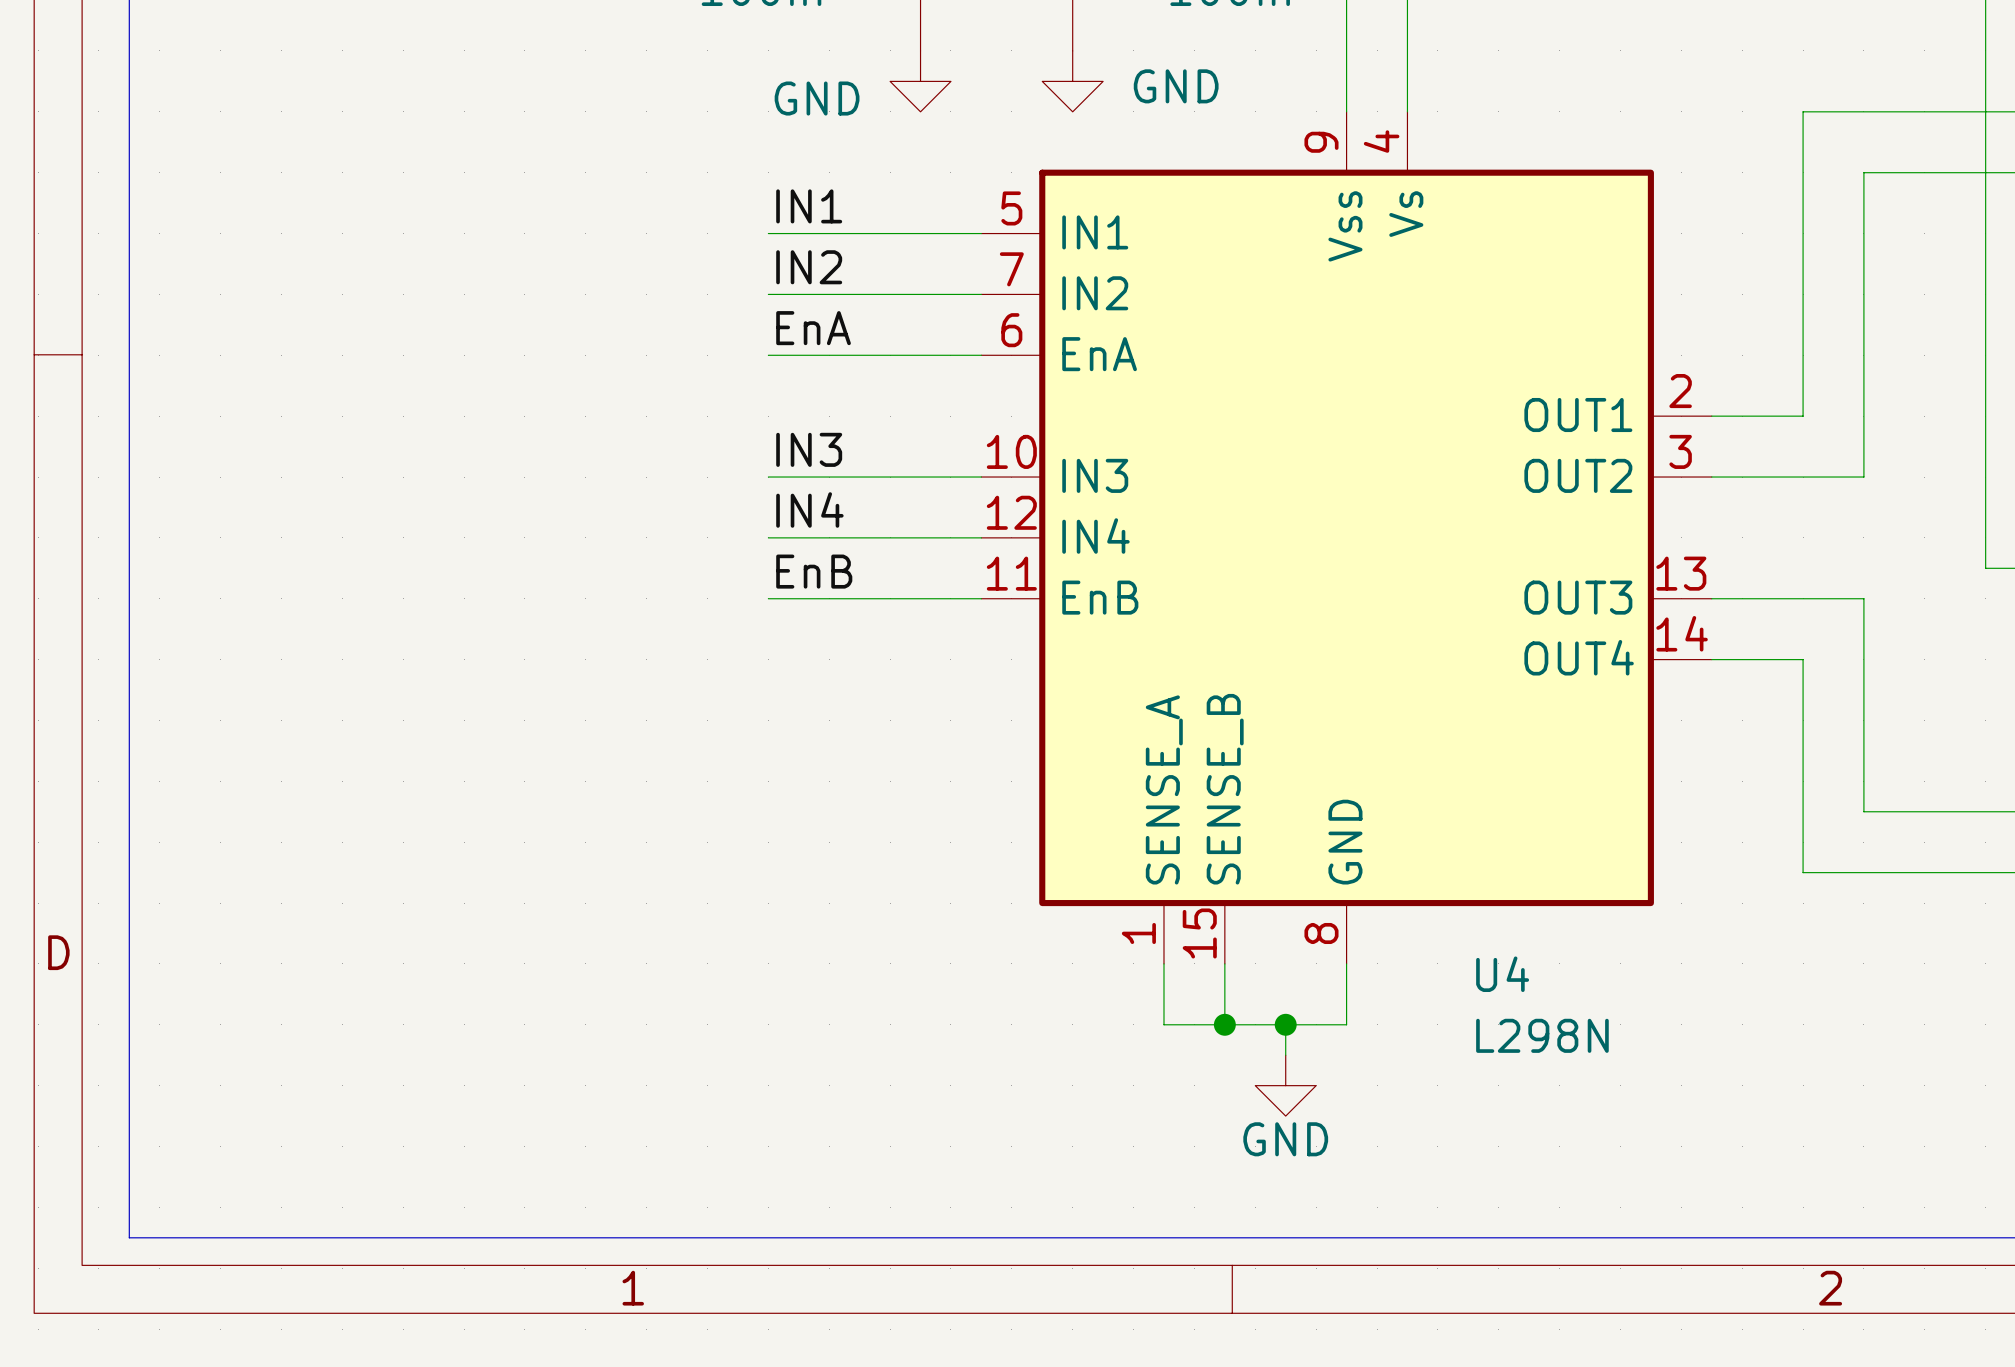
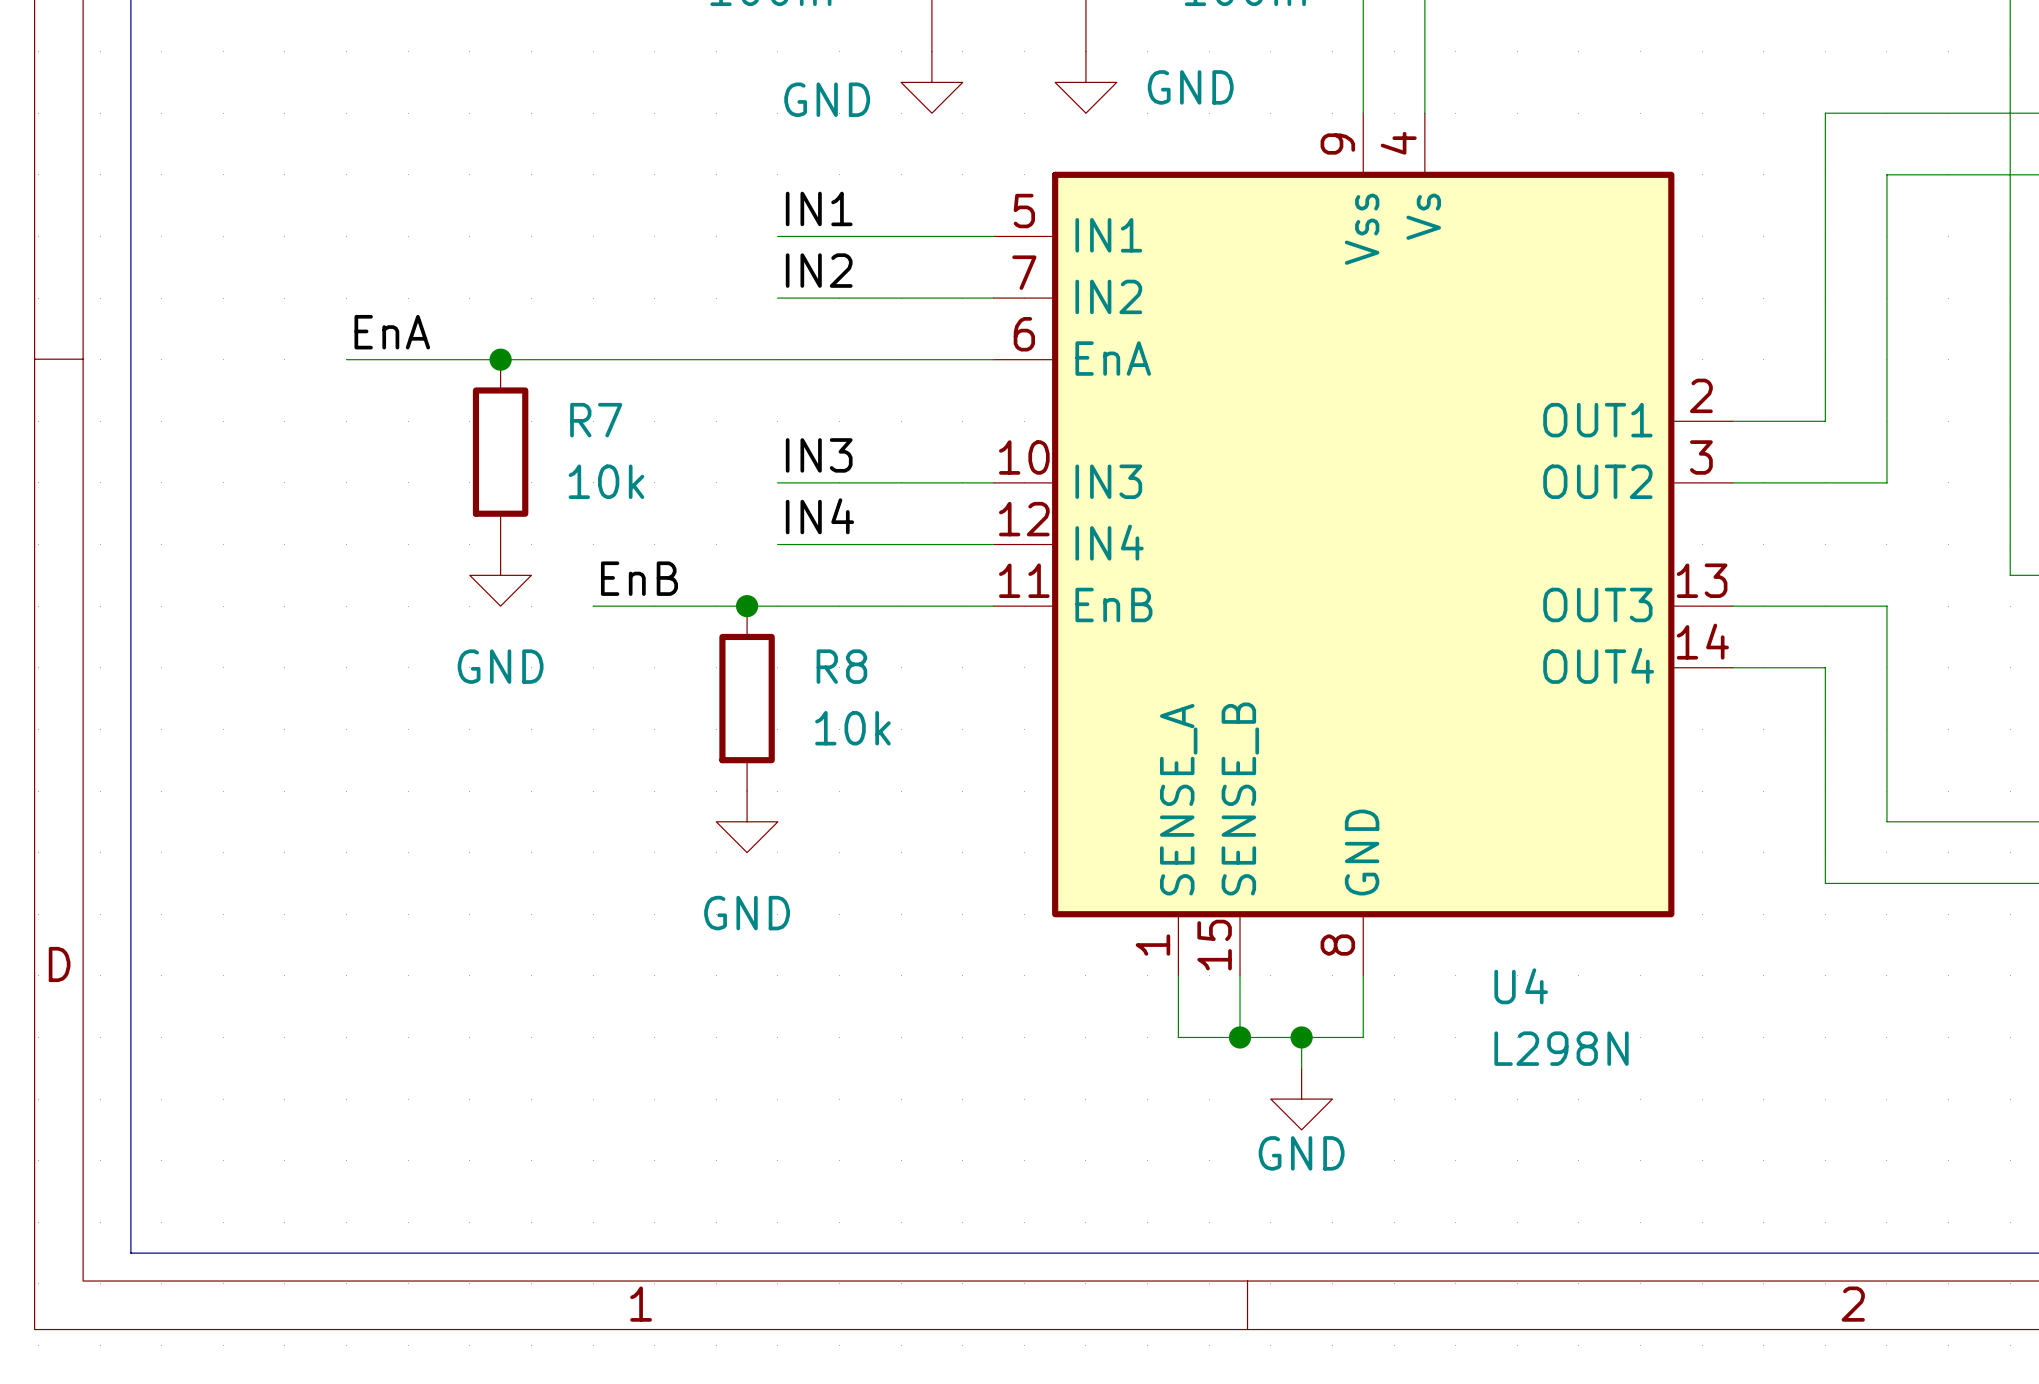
label position: EnA (813, 328) -> EnA (392, 332)
wire: none -> (346, 359) (777, 359)
junction: none -> (500, 359)
R7: none -> 10k (500, 452)
power symbol: none -> GND (500, 575)
label position: EnB (814, 571) -> EnB (639, 578)
wire: none -> (593, 606) (777, 606)
junction: none -> (747, 606)
R8: none -> 10k (747, 698)
power symbol: none -> GND (747, 821)

